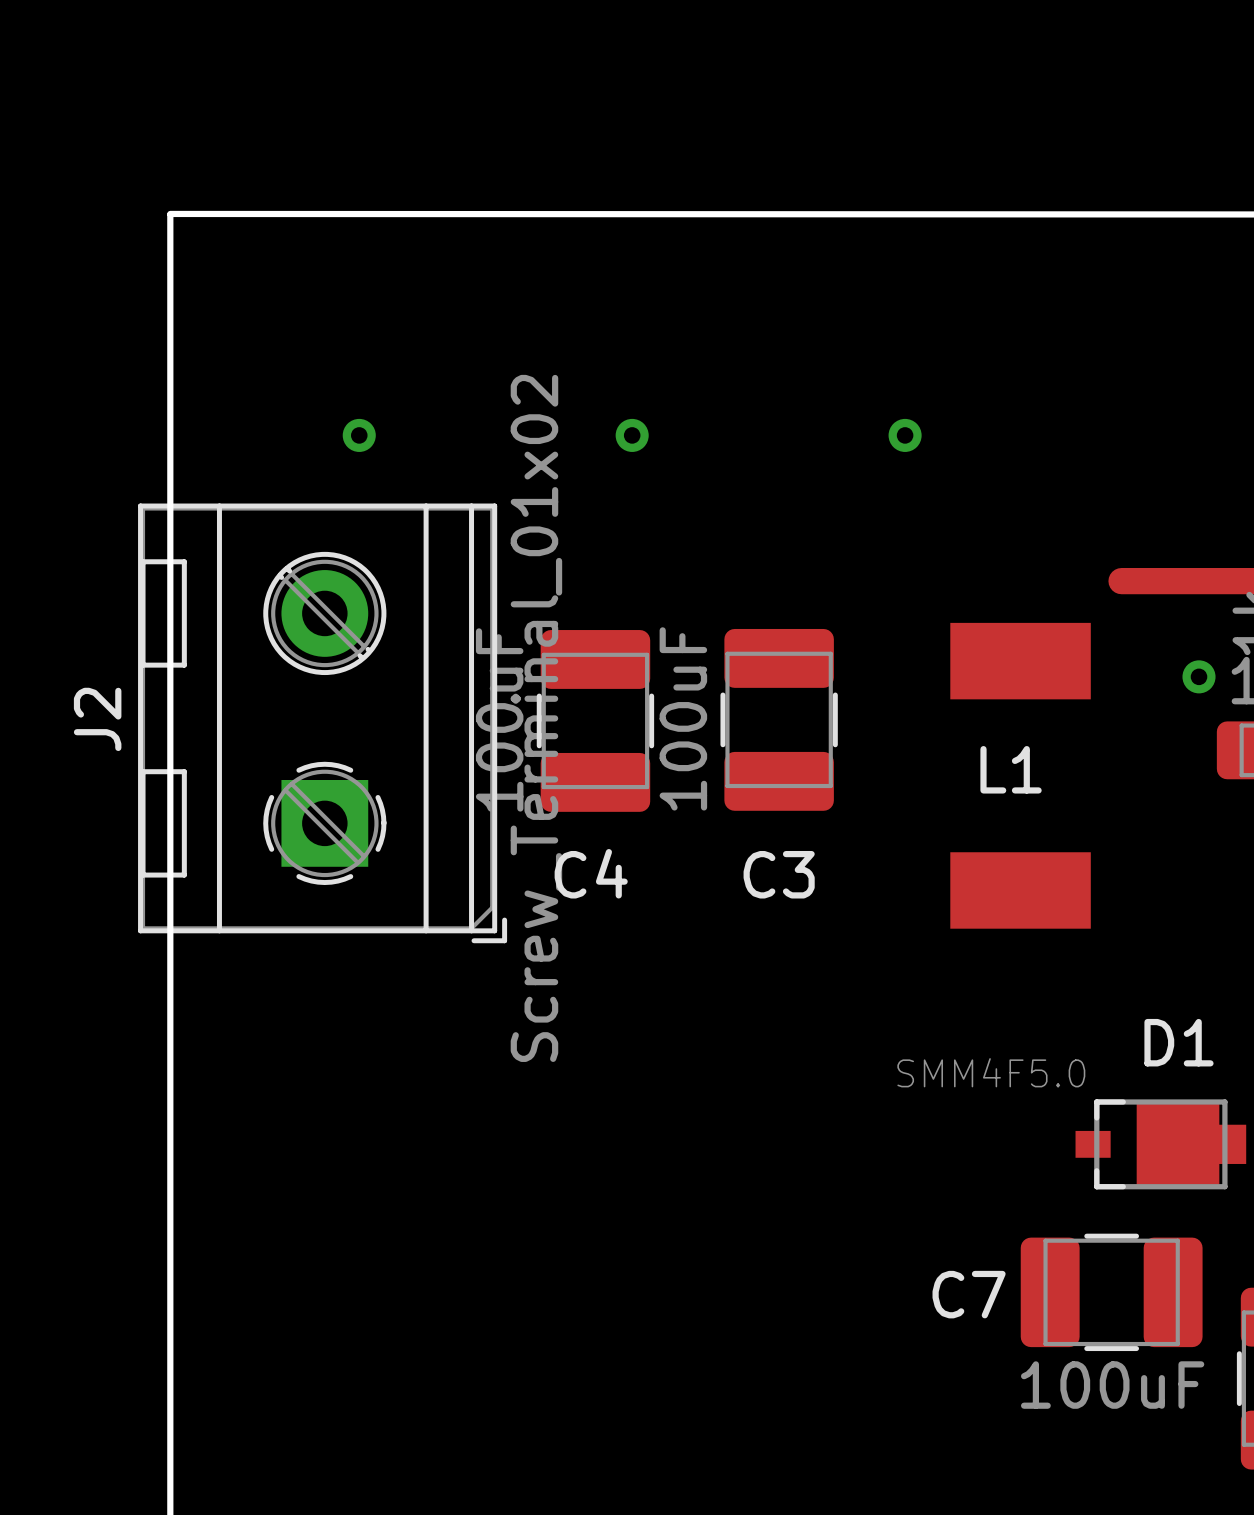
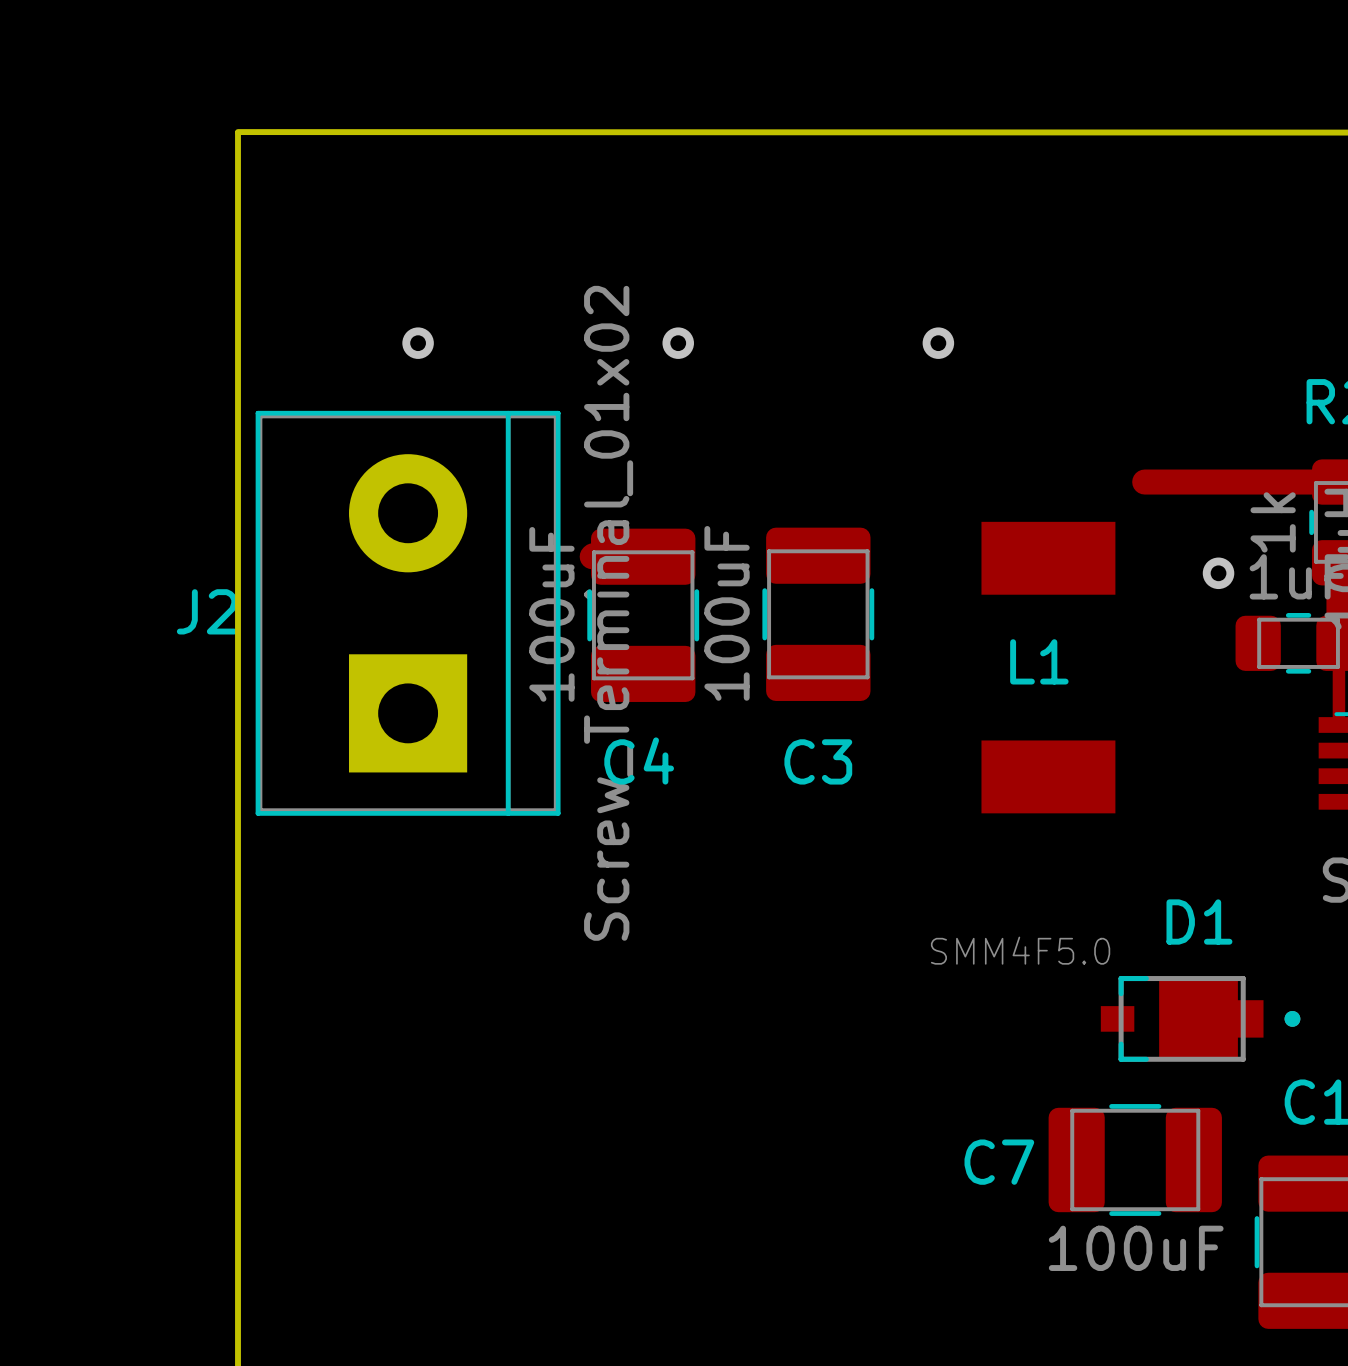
J2 footprint: [138, 503, 508, 944] -> [255, 410, 561, 816]
top track: none -> (593, 555) (592, 556)

